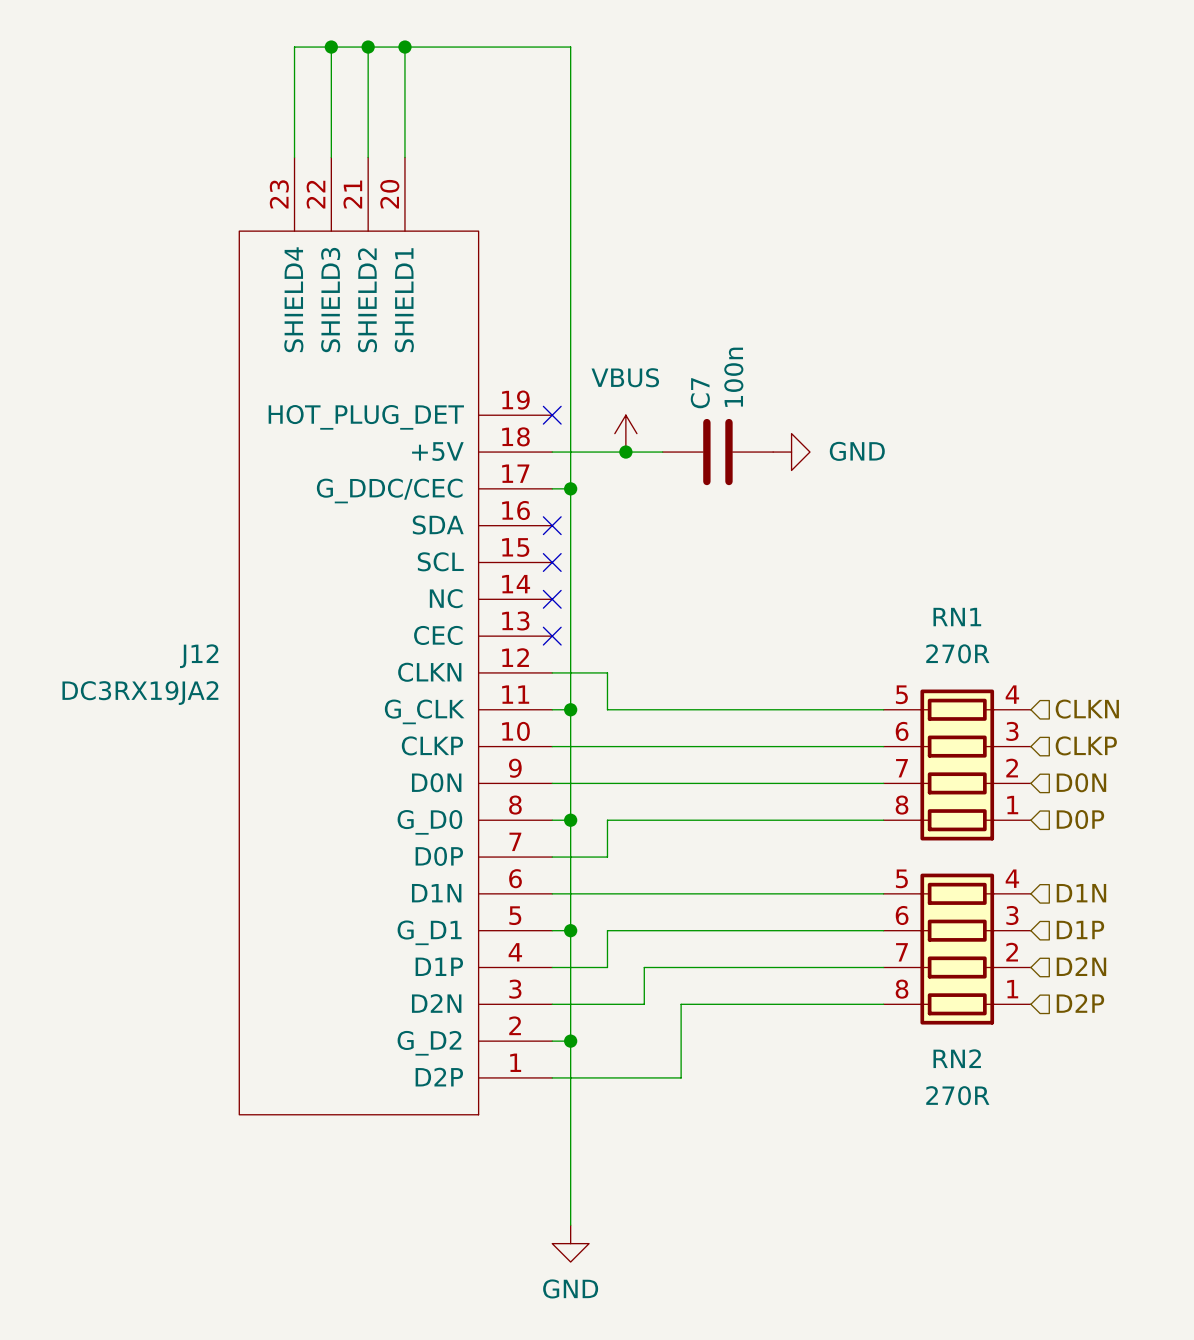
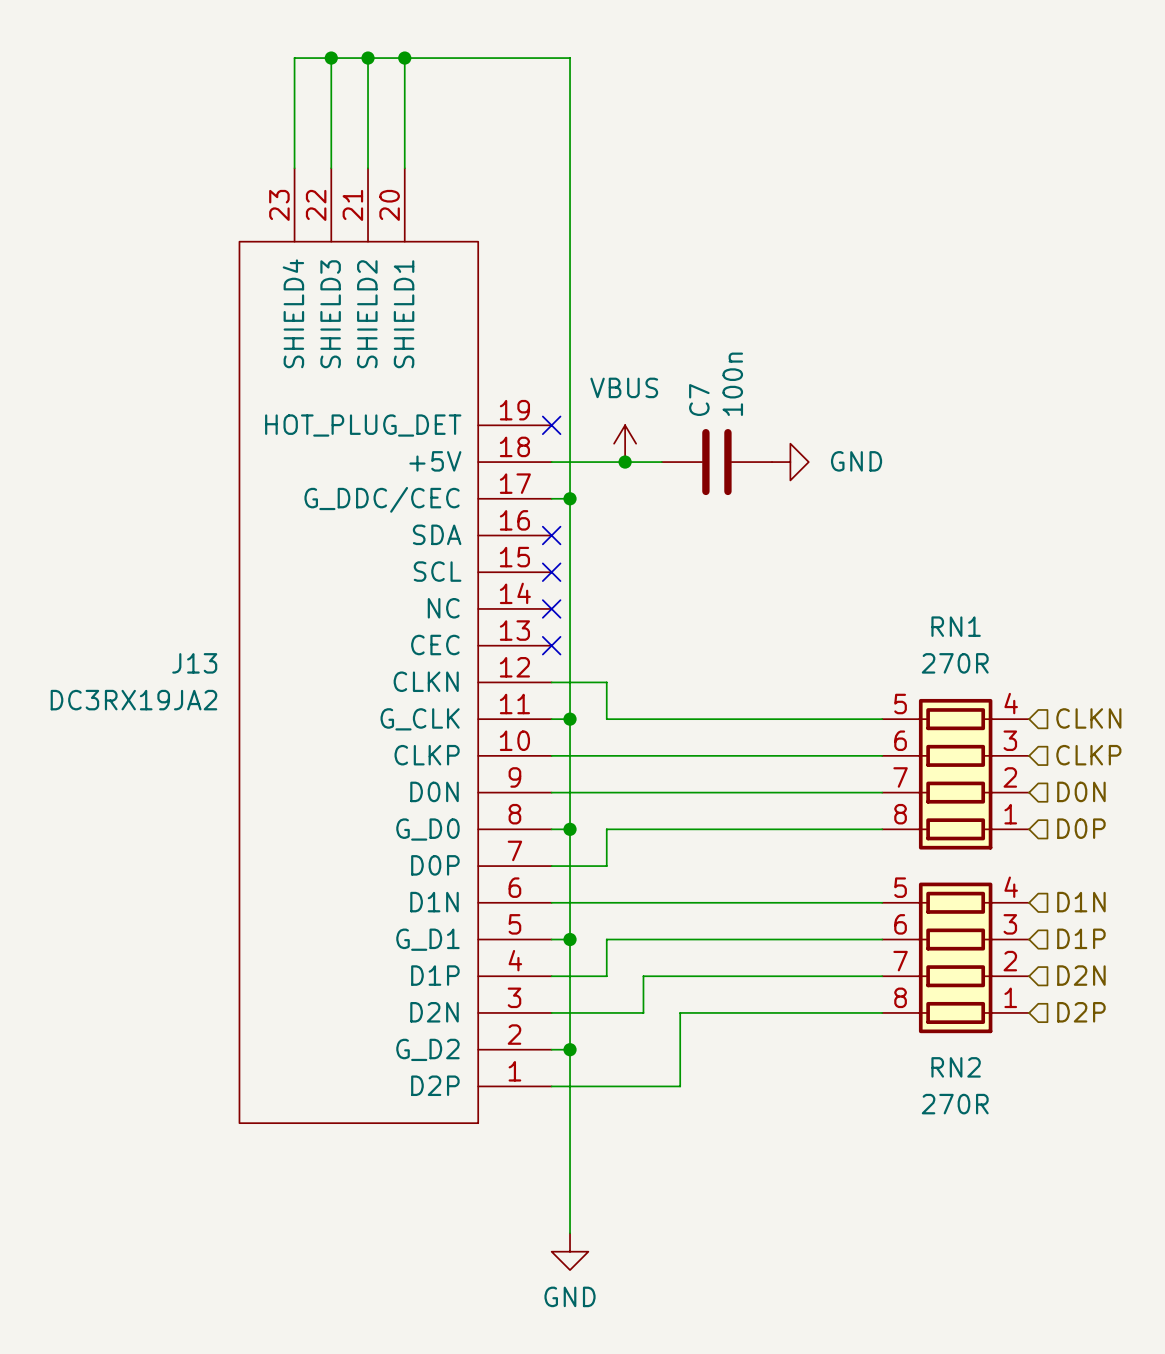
J12 name: J12 (199, 656) -> J13 (194, 663)

